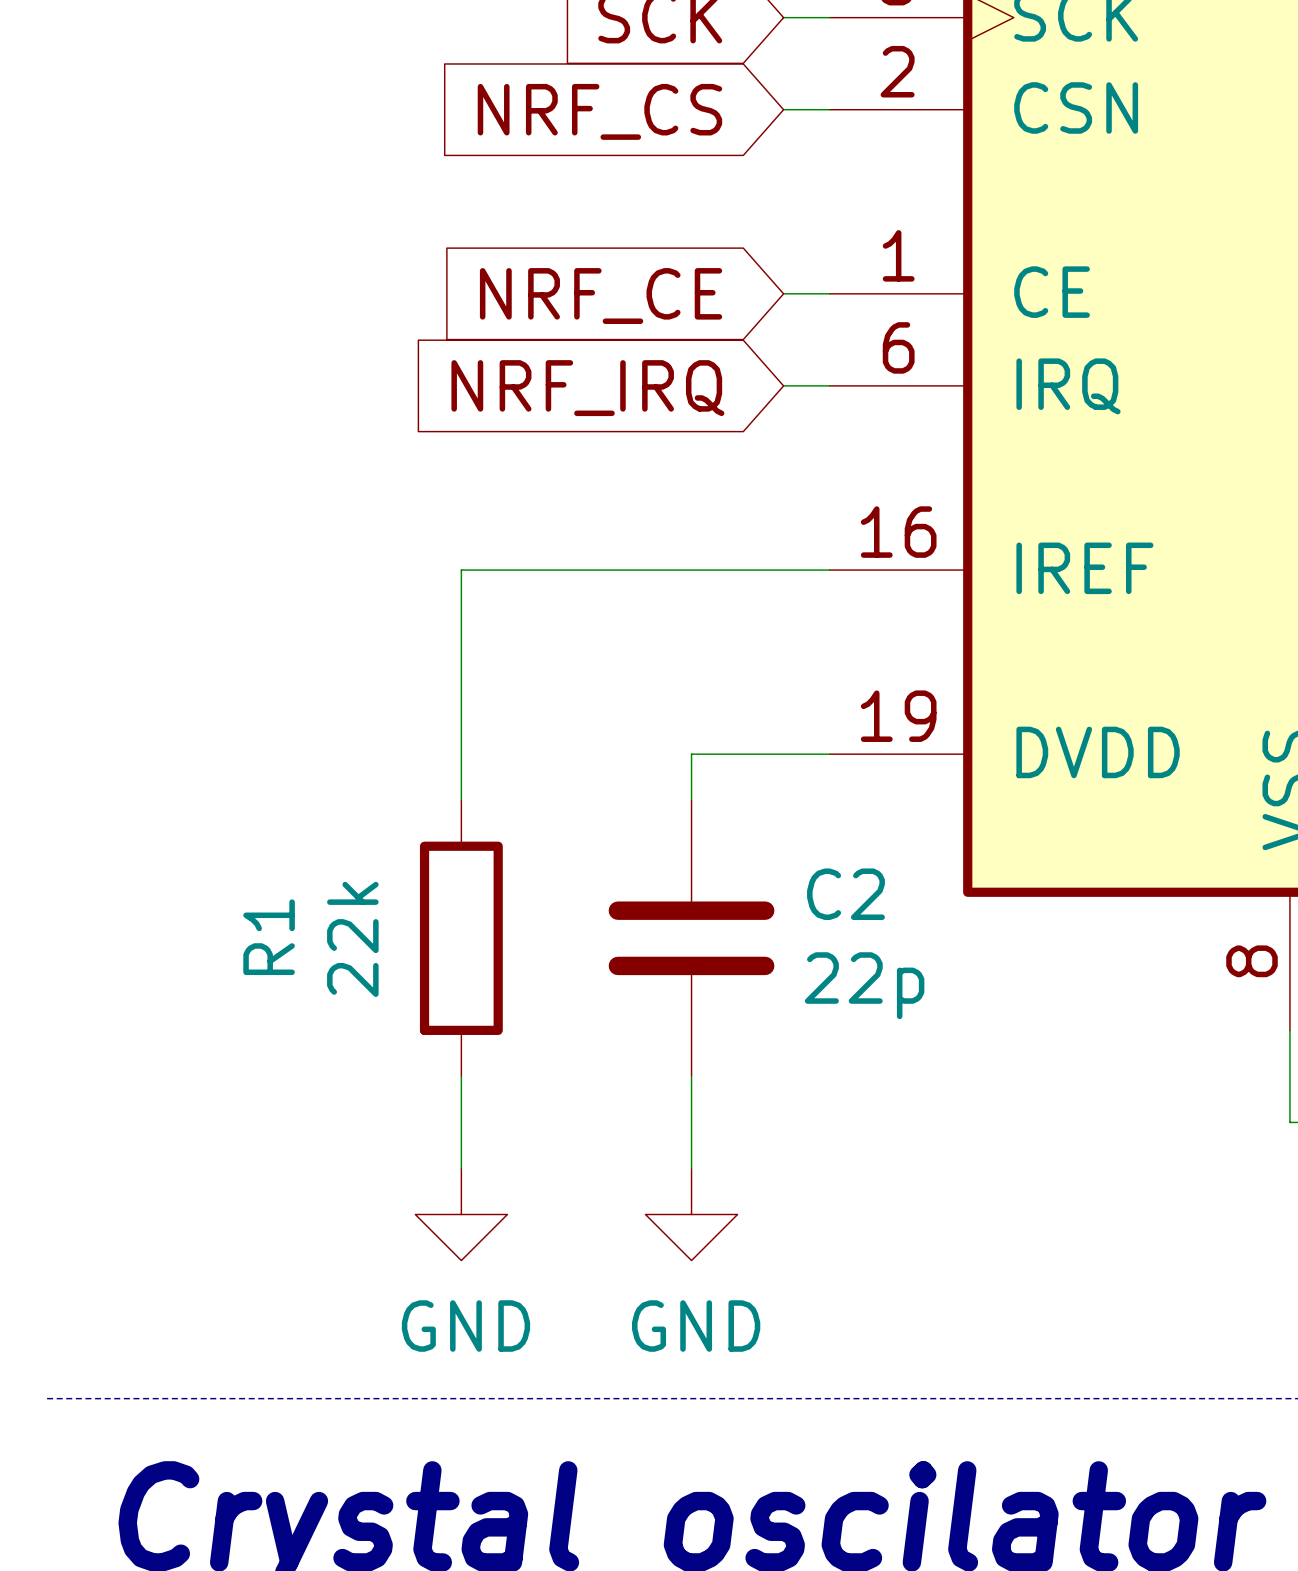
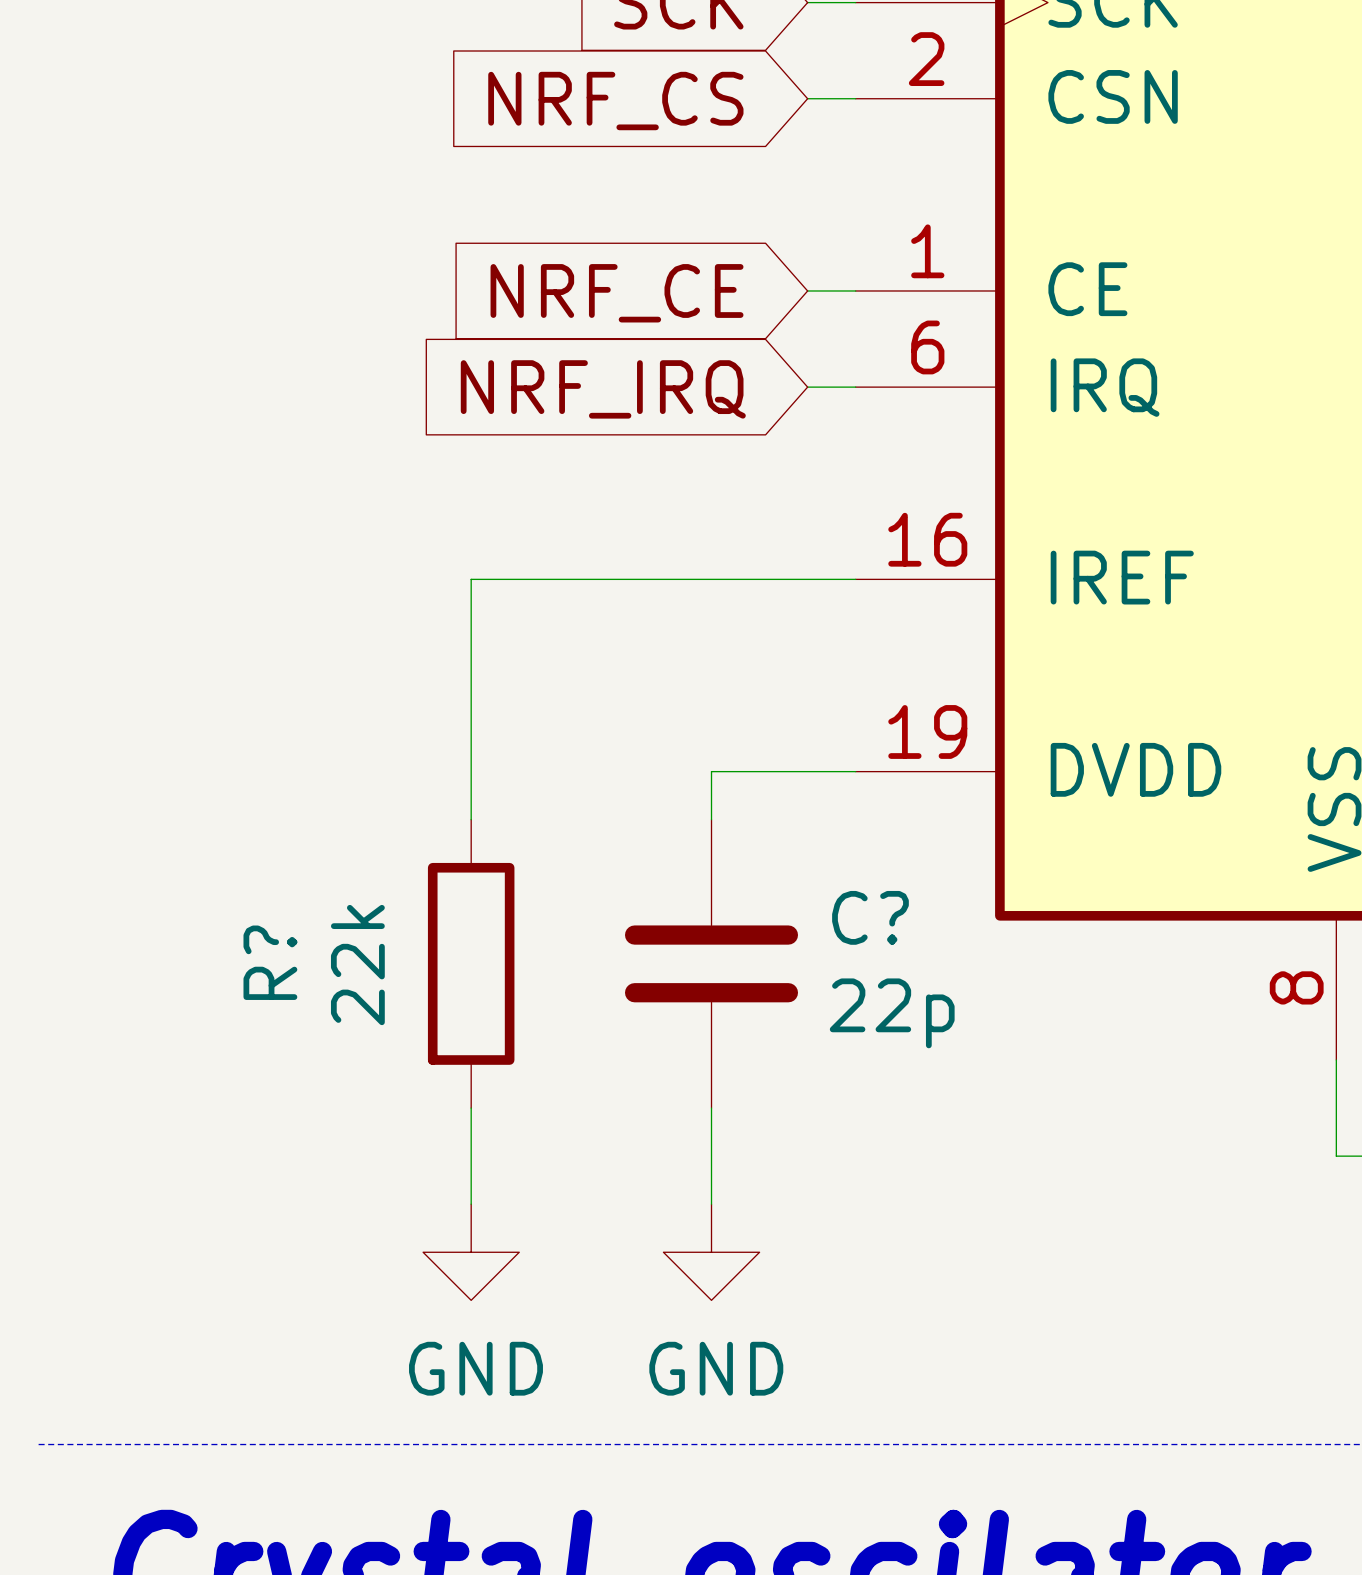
C2 name: C2 (845, 894) -> C? (870, 917)
R1 name: R1 (269, 937) -> R? (270, 962)

